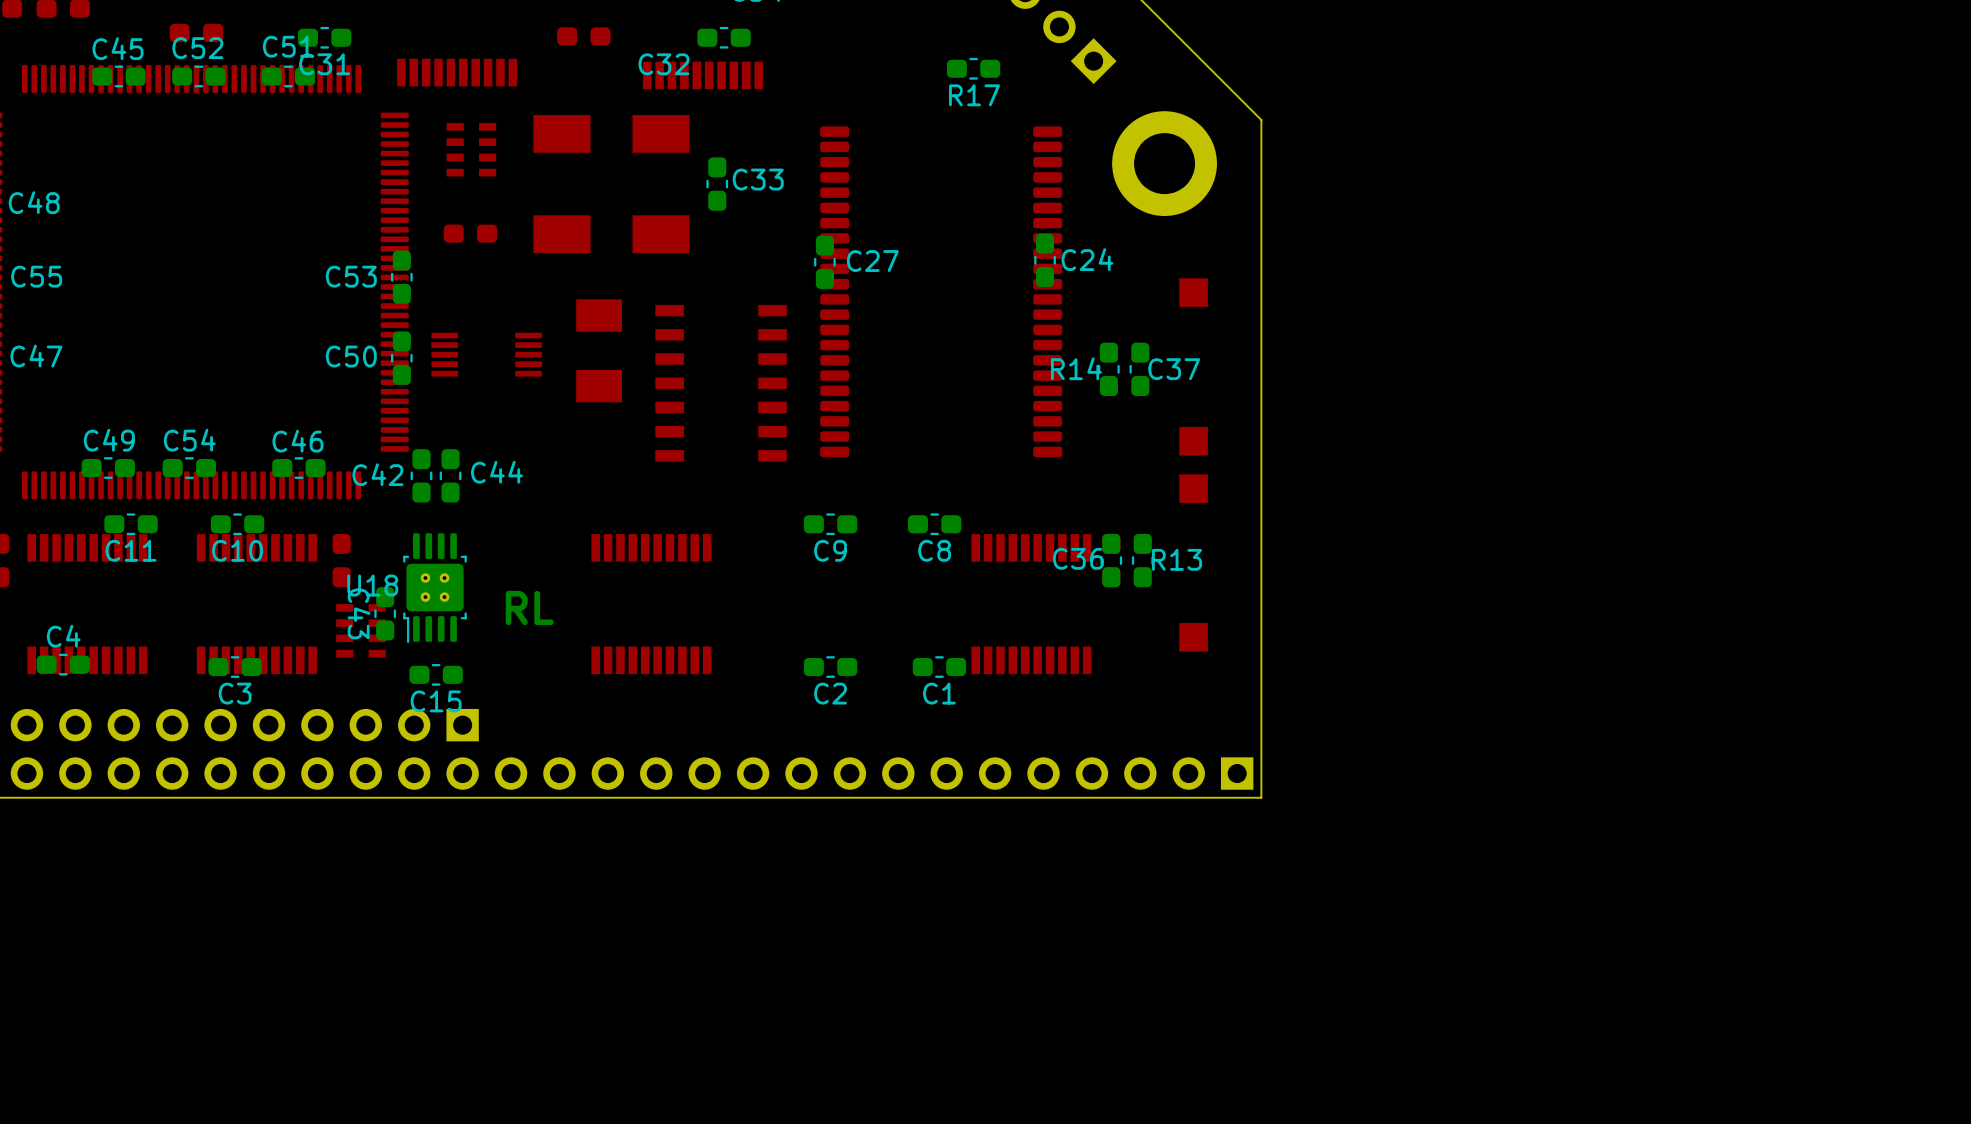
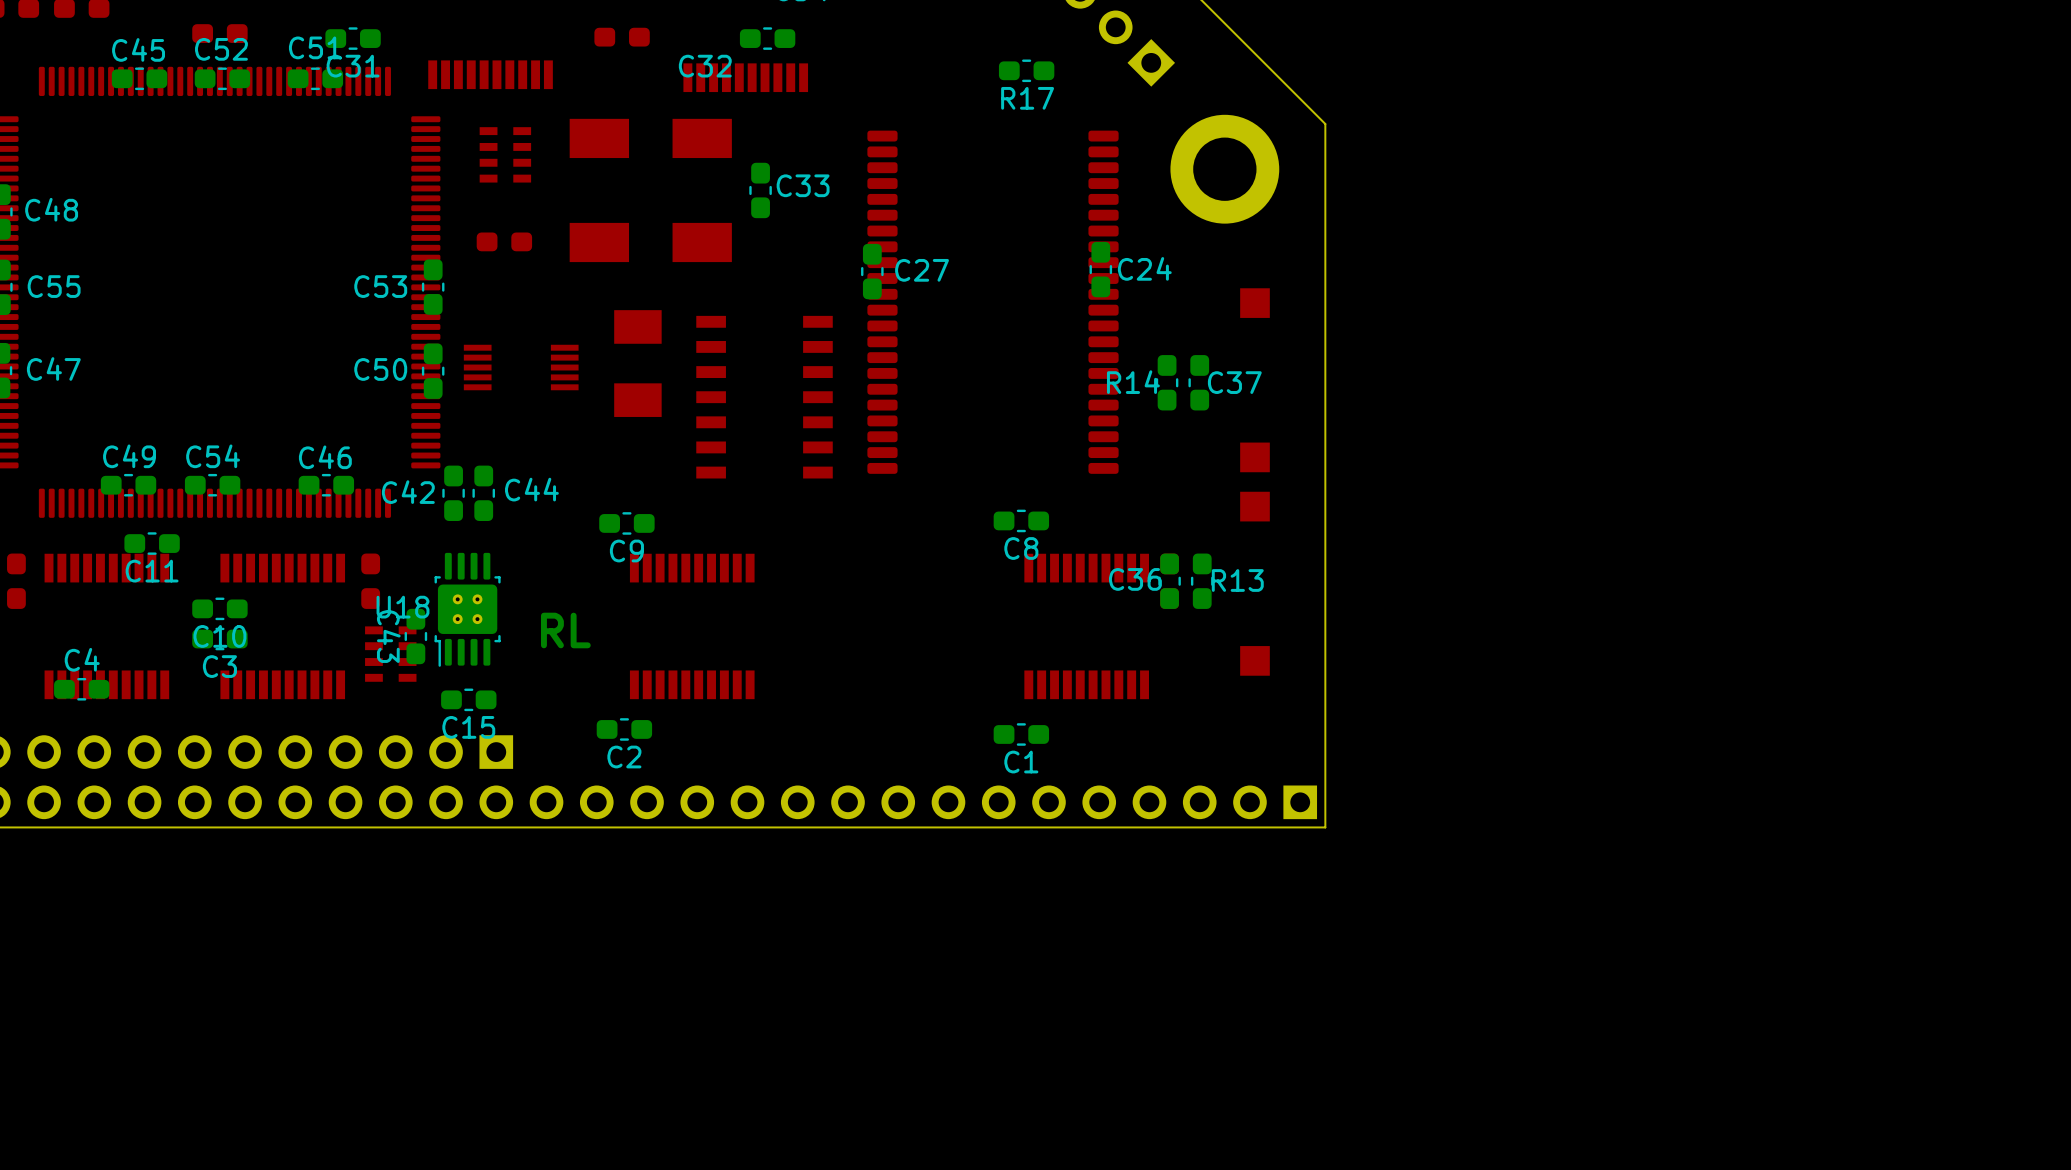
C10 position: (237, 524) -> (219, 608)
C9 position: (830, 524) -> (626, 523)
C8 position: (934, 524) -> (1021, 520)
C3 position: (235, 667) -> (219, 639)
C2 position: (830, 667) -> (624, 729)
C1 position: (939, 667) -> (1021, 734)

